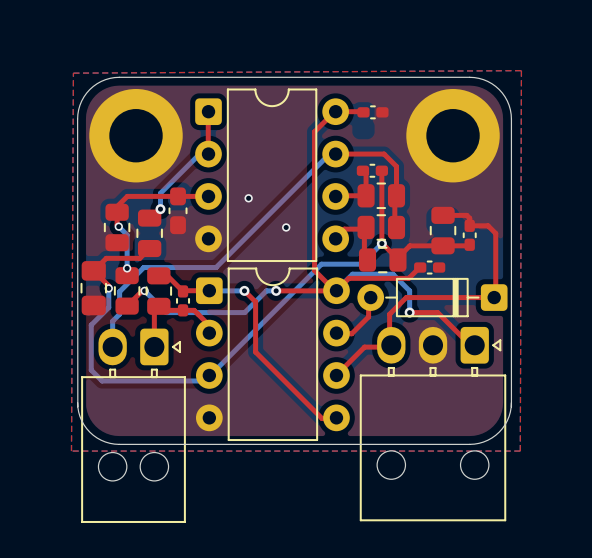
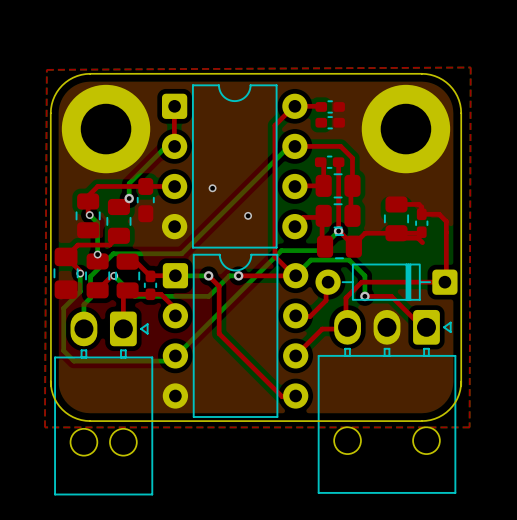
top track: none -> (396, 238) (418, 238) (422, 242)
top track: (420, 267) (408, 278) (348, 278) (336, 290) -> none
part position: (429, 267) -> (330, 122)

